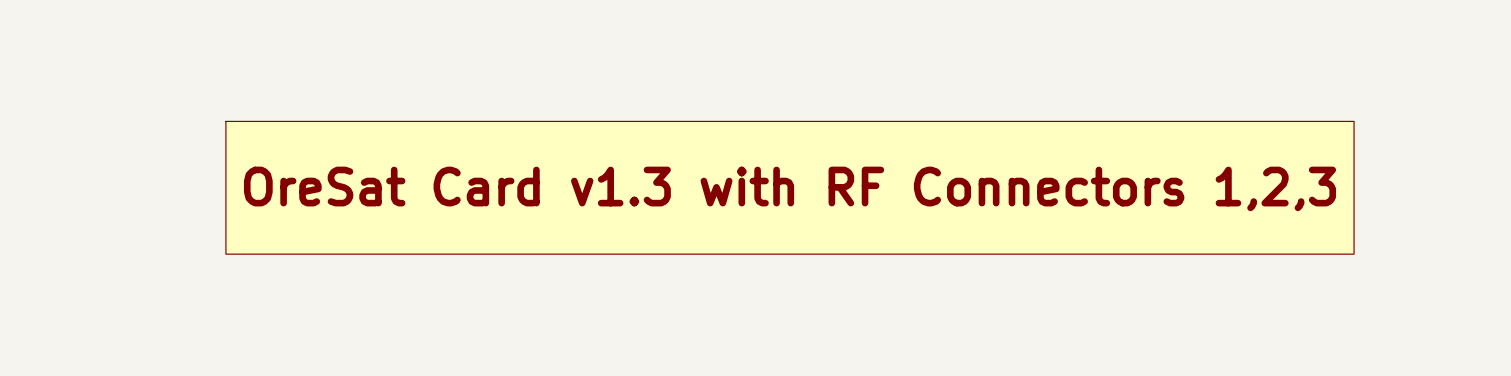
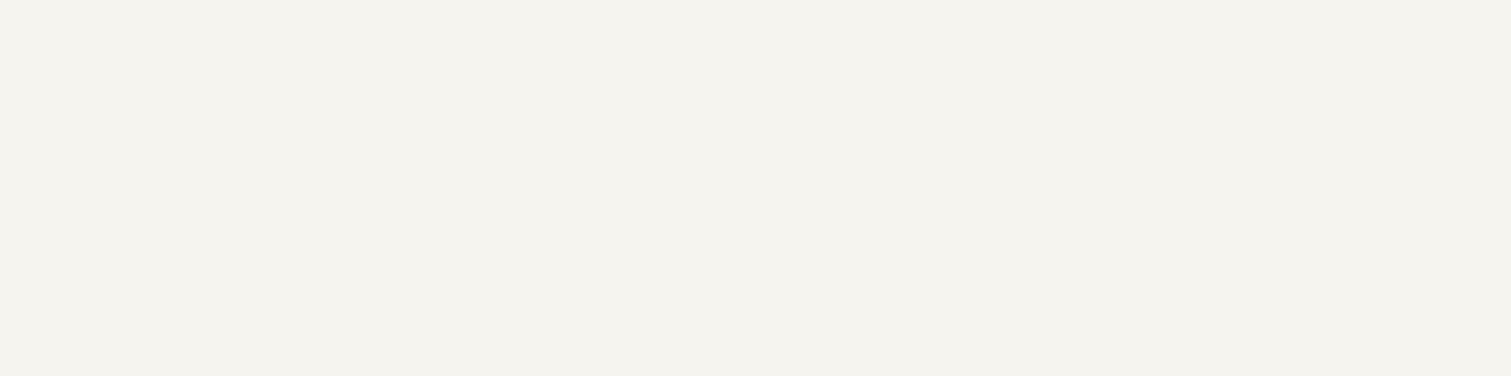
part: (789, 187) -> none

